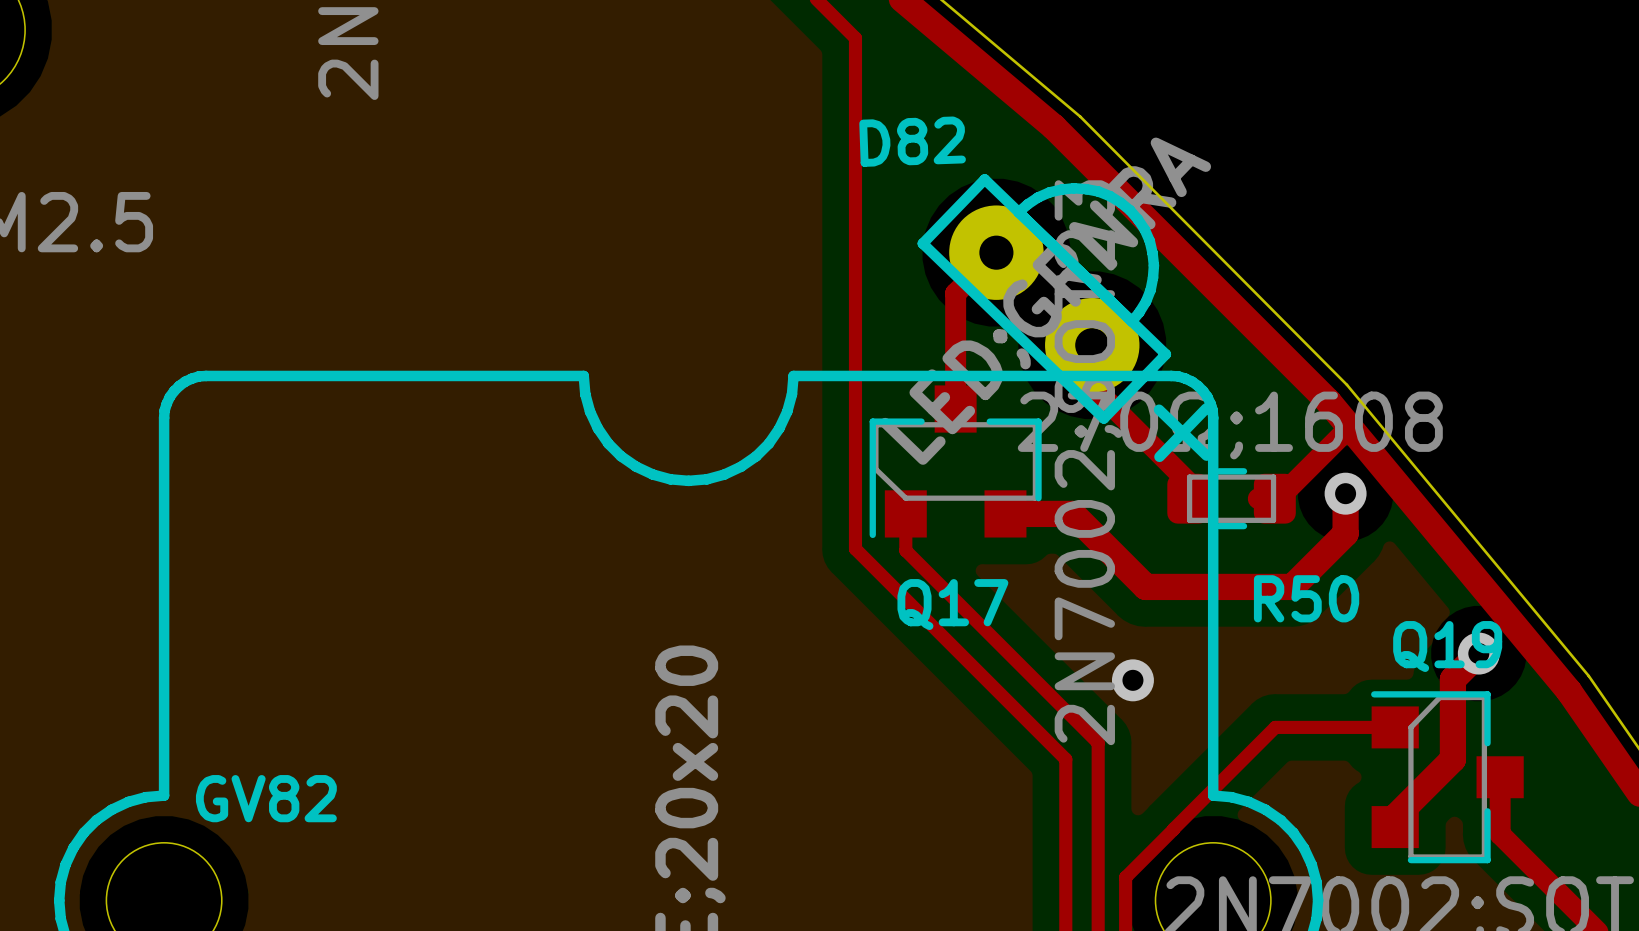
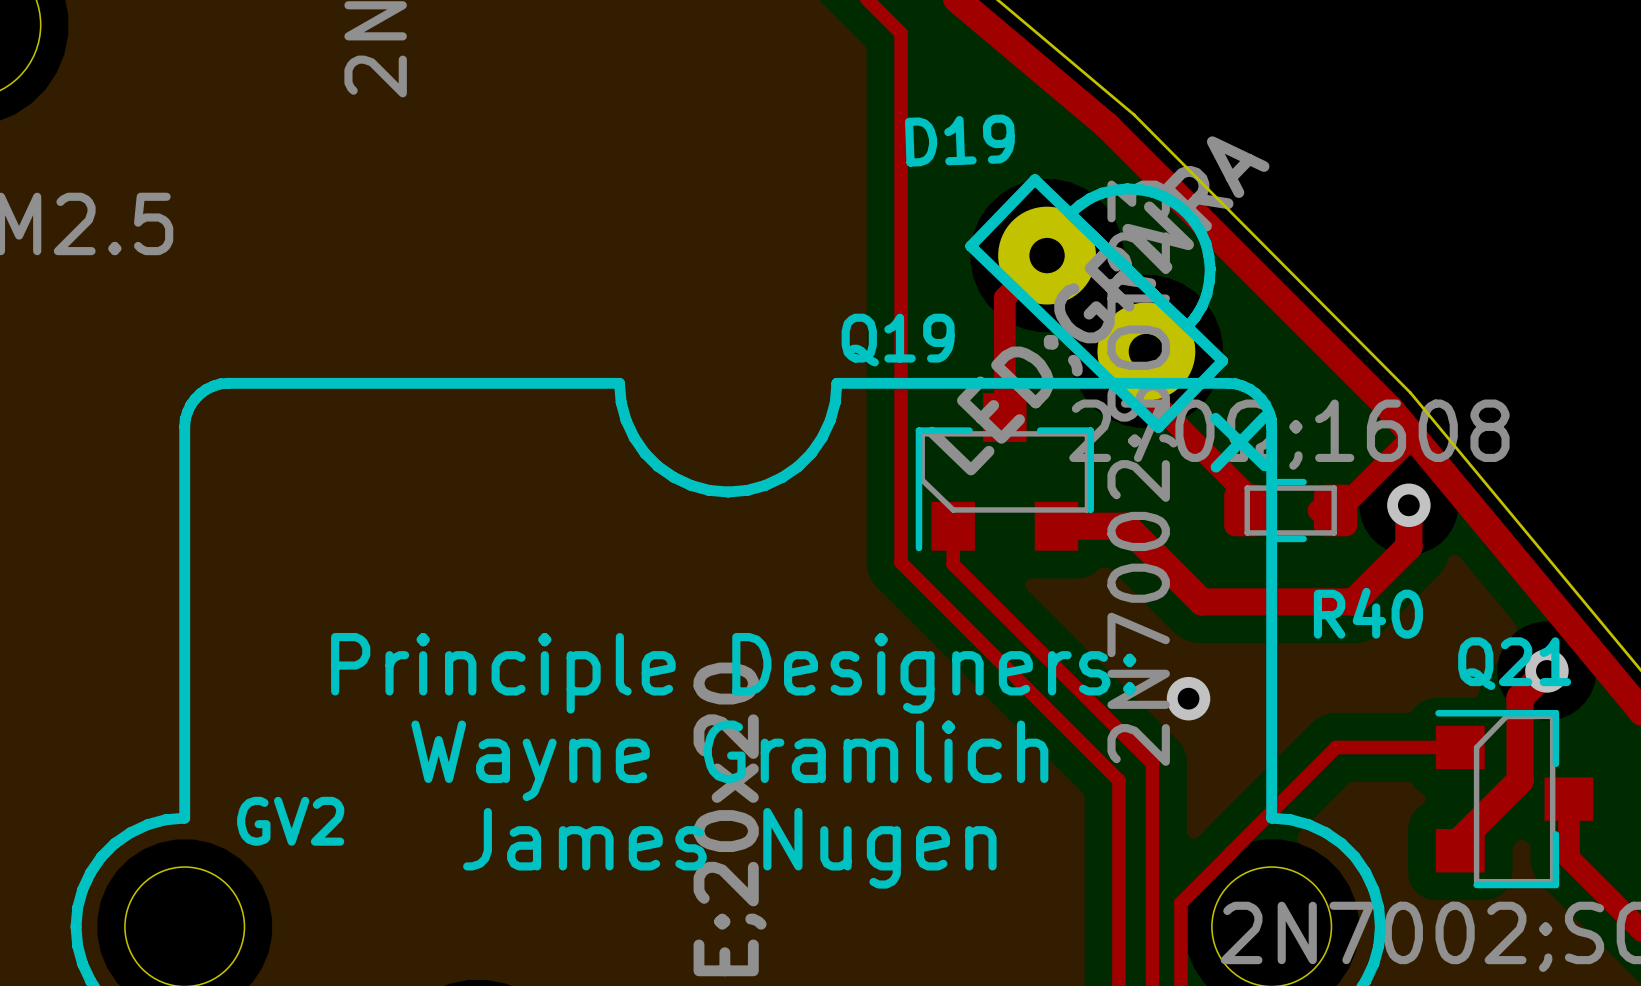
D82 name: D82 (912, 141) -> D19 (959, 140)
R50 name: R50 (1306, 598) -> R40 (1368, 613)
Q17 name: Q17 (952, 604) -> Q19 (898, 340)
Q19 name: Q19 (1447, 646) -> Q21 (1514, 663)
text: none -> Principle Designers: (733, 673)
text: none -> Wayne Gramlich (729, 760)
GV82 name: GV82 (266, 798) -> GV2 (290, 821)
text: none -> James Nugen (729, 848)

